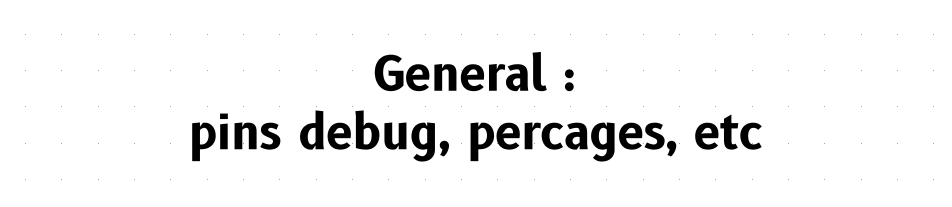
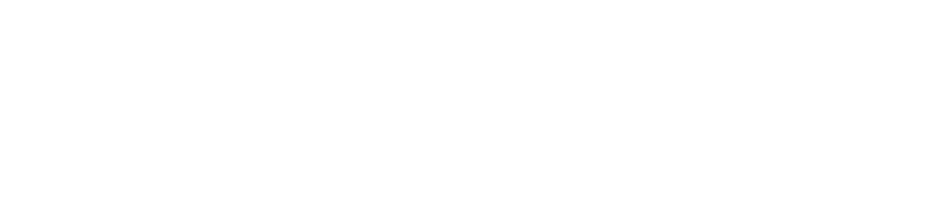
text: General : (474, 71) -> none
text: pins debug, percages, etc (476, 135) -> none

